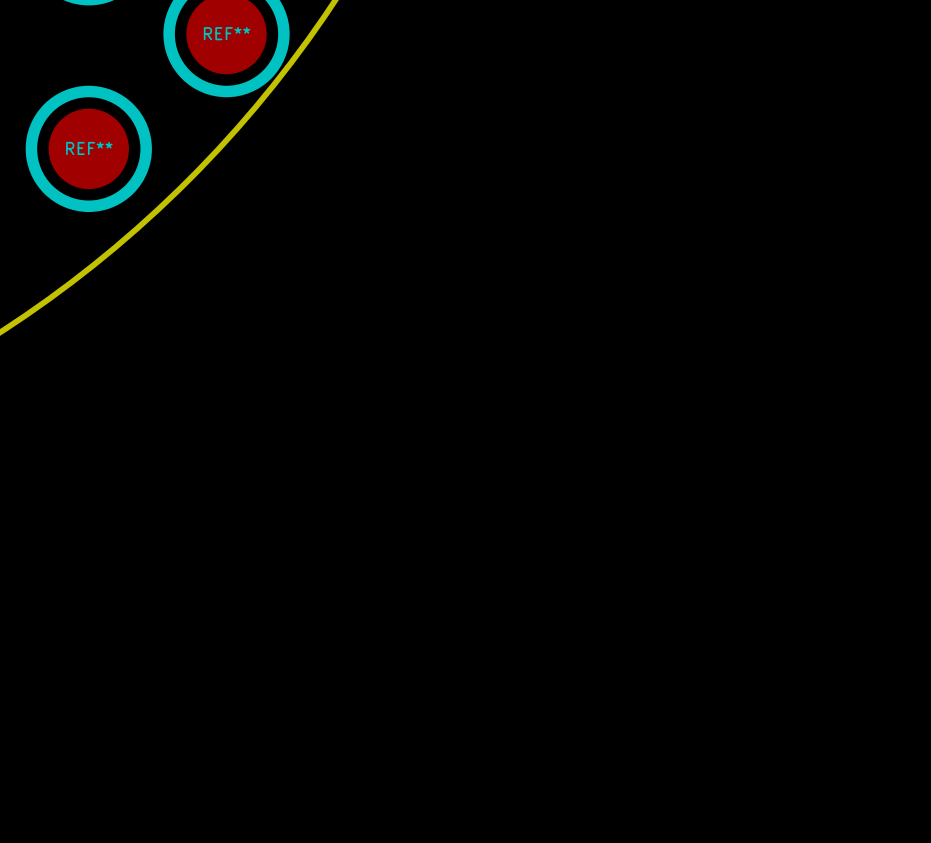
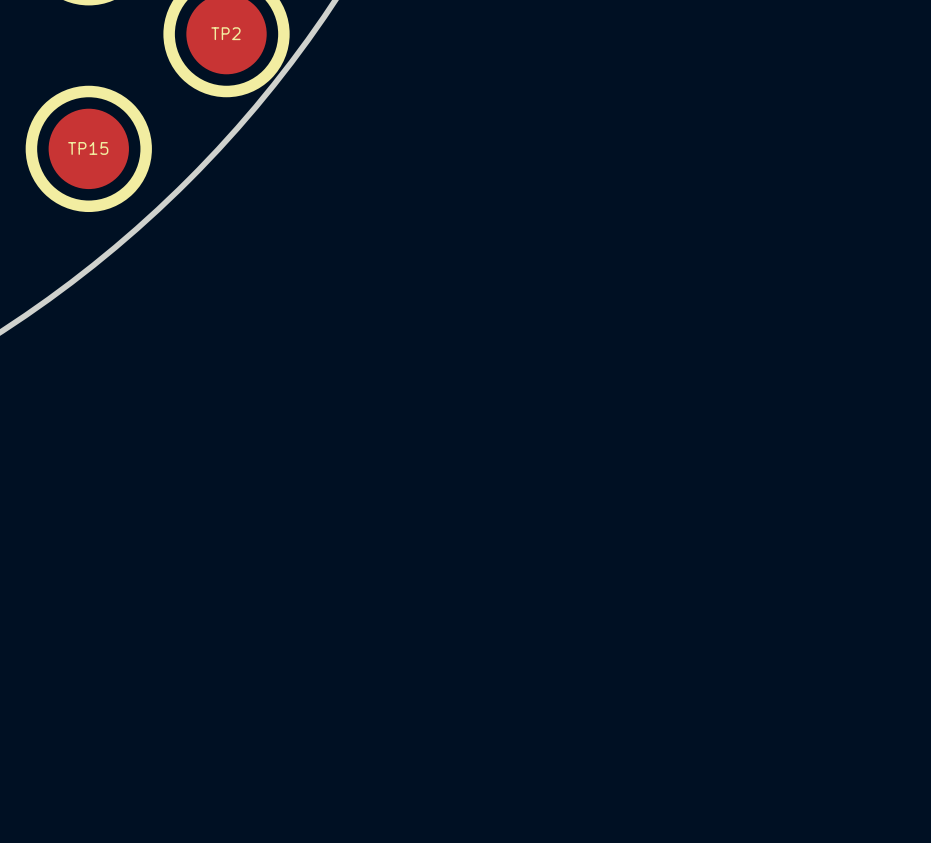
REF** name: REF** (227, 33) -> TP2 (225, 33)
REF** name: REF** (89, 148) -> TP15 (88, 148)

